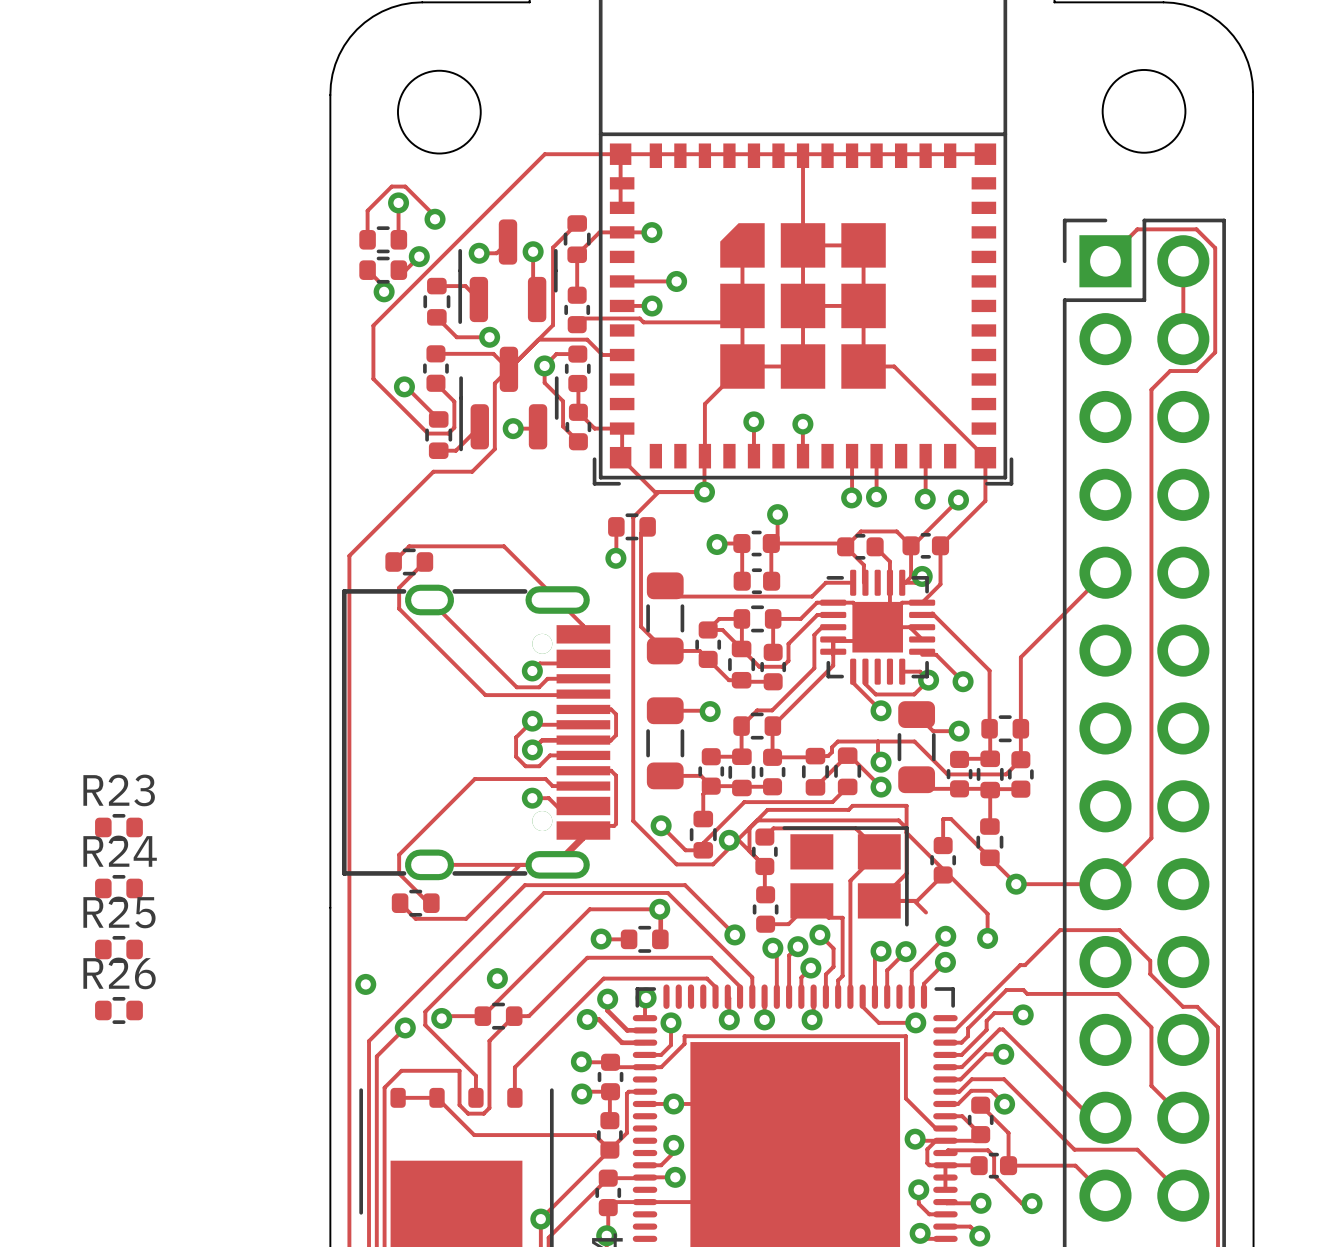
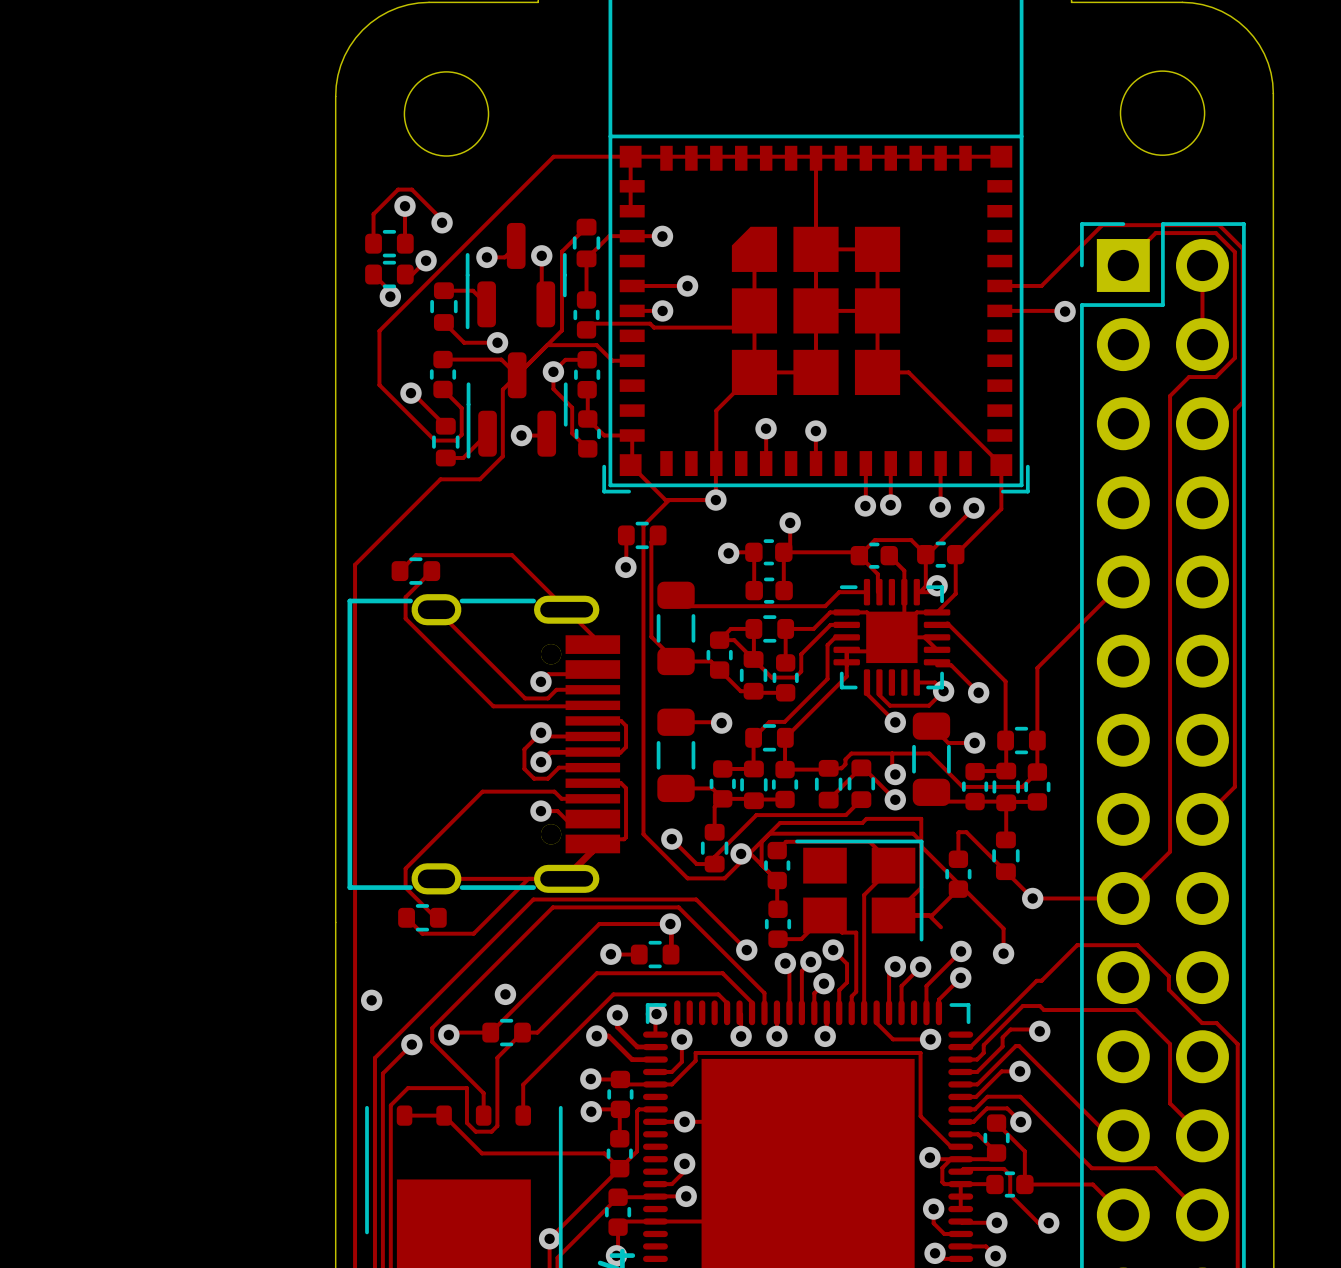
track: none -> (999, 285) (1041, 285) (1102, 225) (1219, 225) (1242, 248) (1242, 402) (1234, 410) (1234, 786) (1202, 819)
track: none -> (999, 310) (1065, 311)
via: none -> (1065, 311)
R23: (118, 827) -> none
R24: (118, 888) -> none
R25: (118, 949) -> none
R26: (118, 1010) -> none

